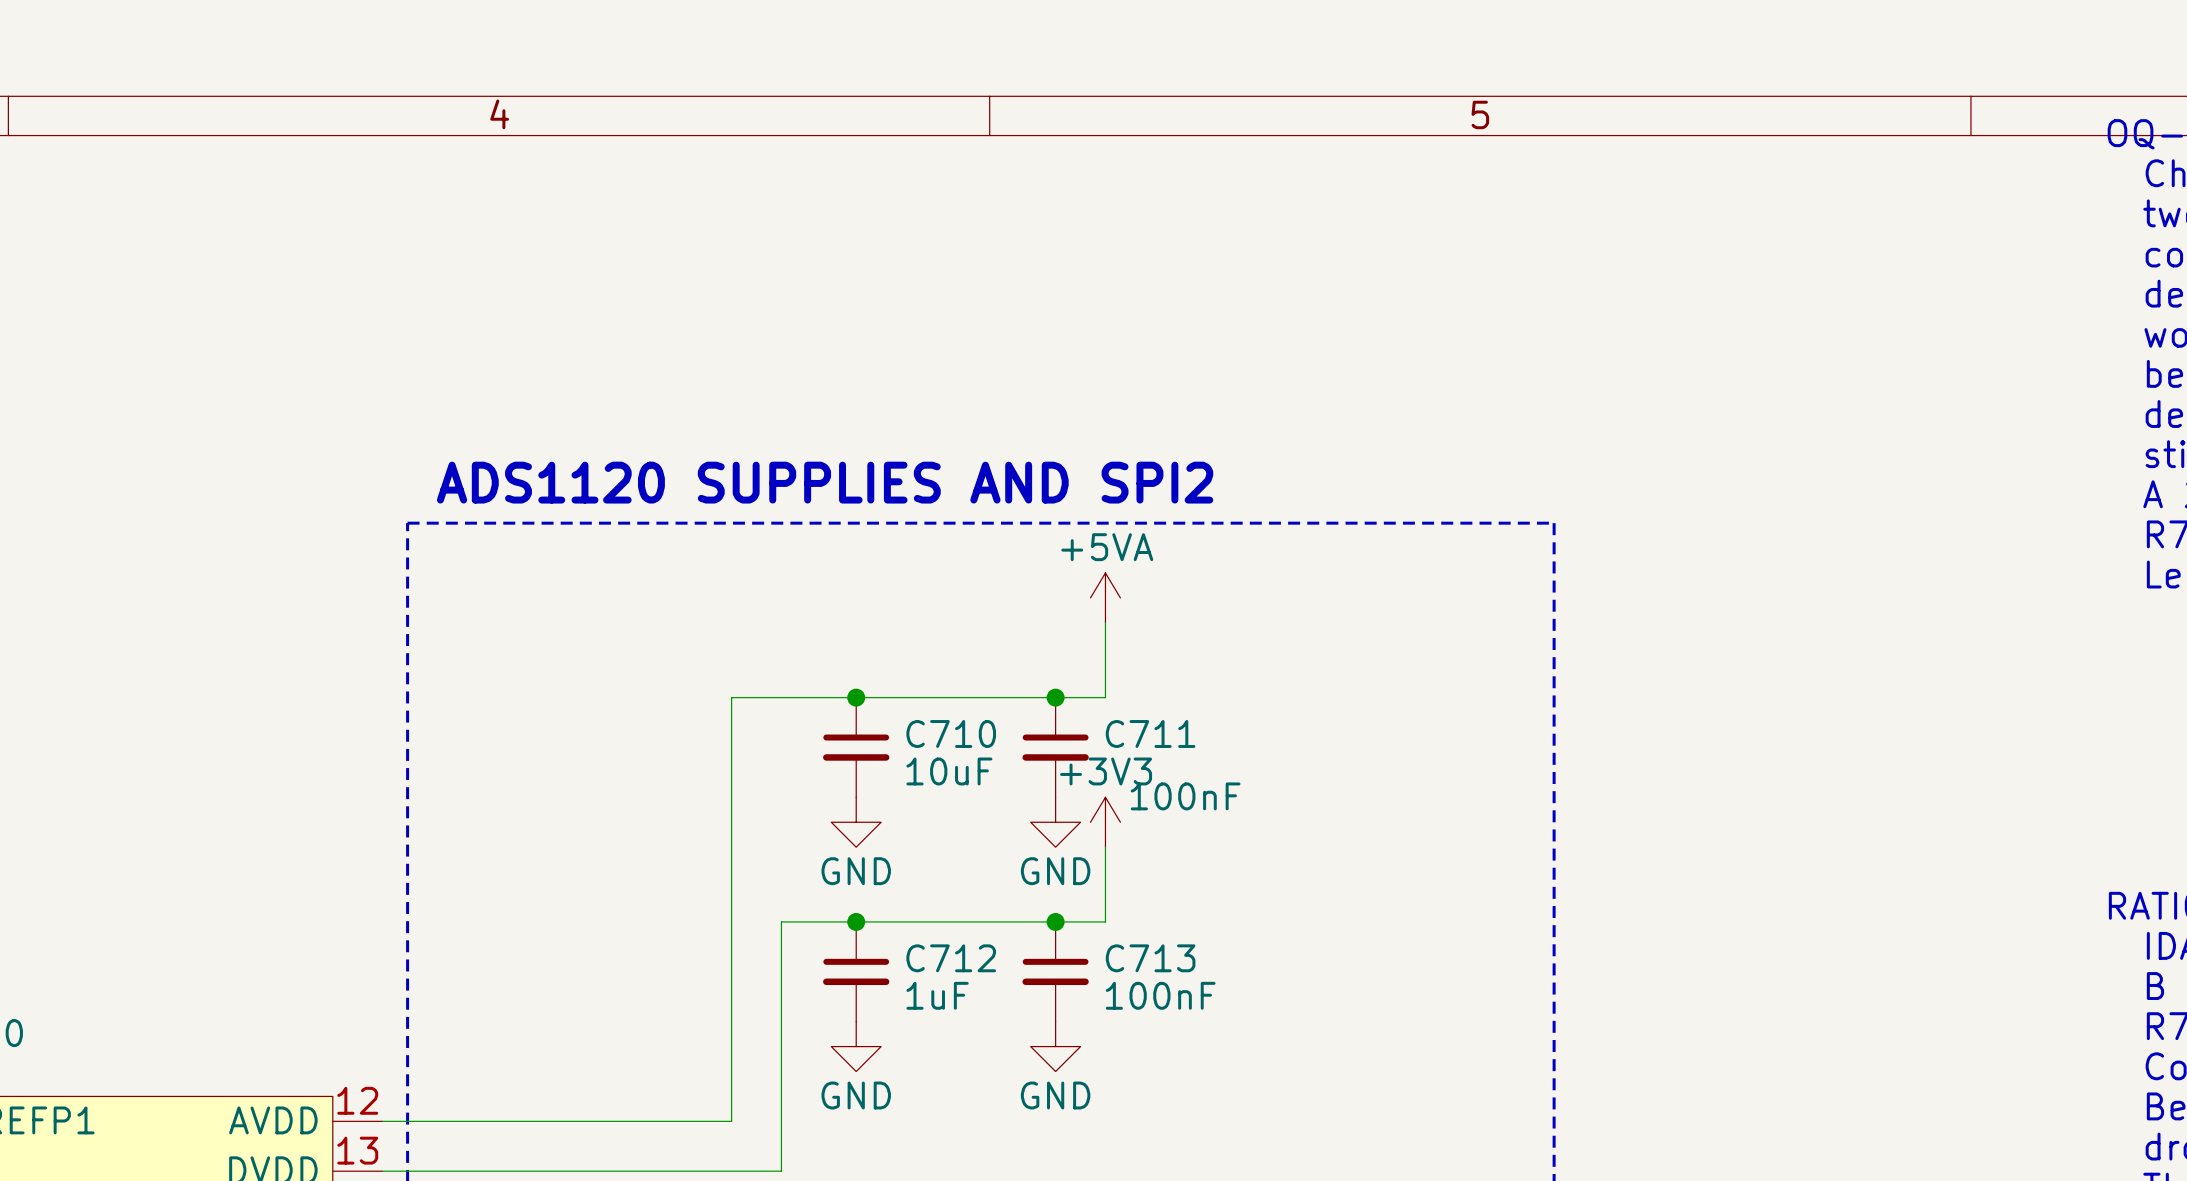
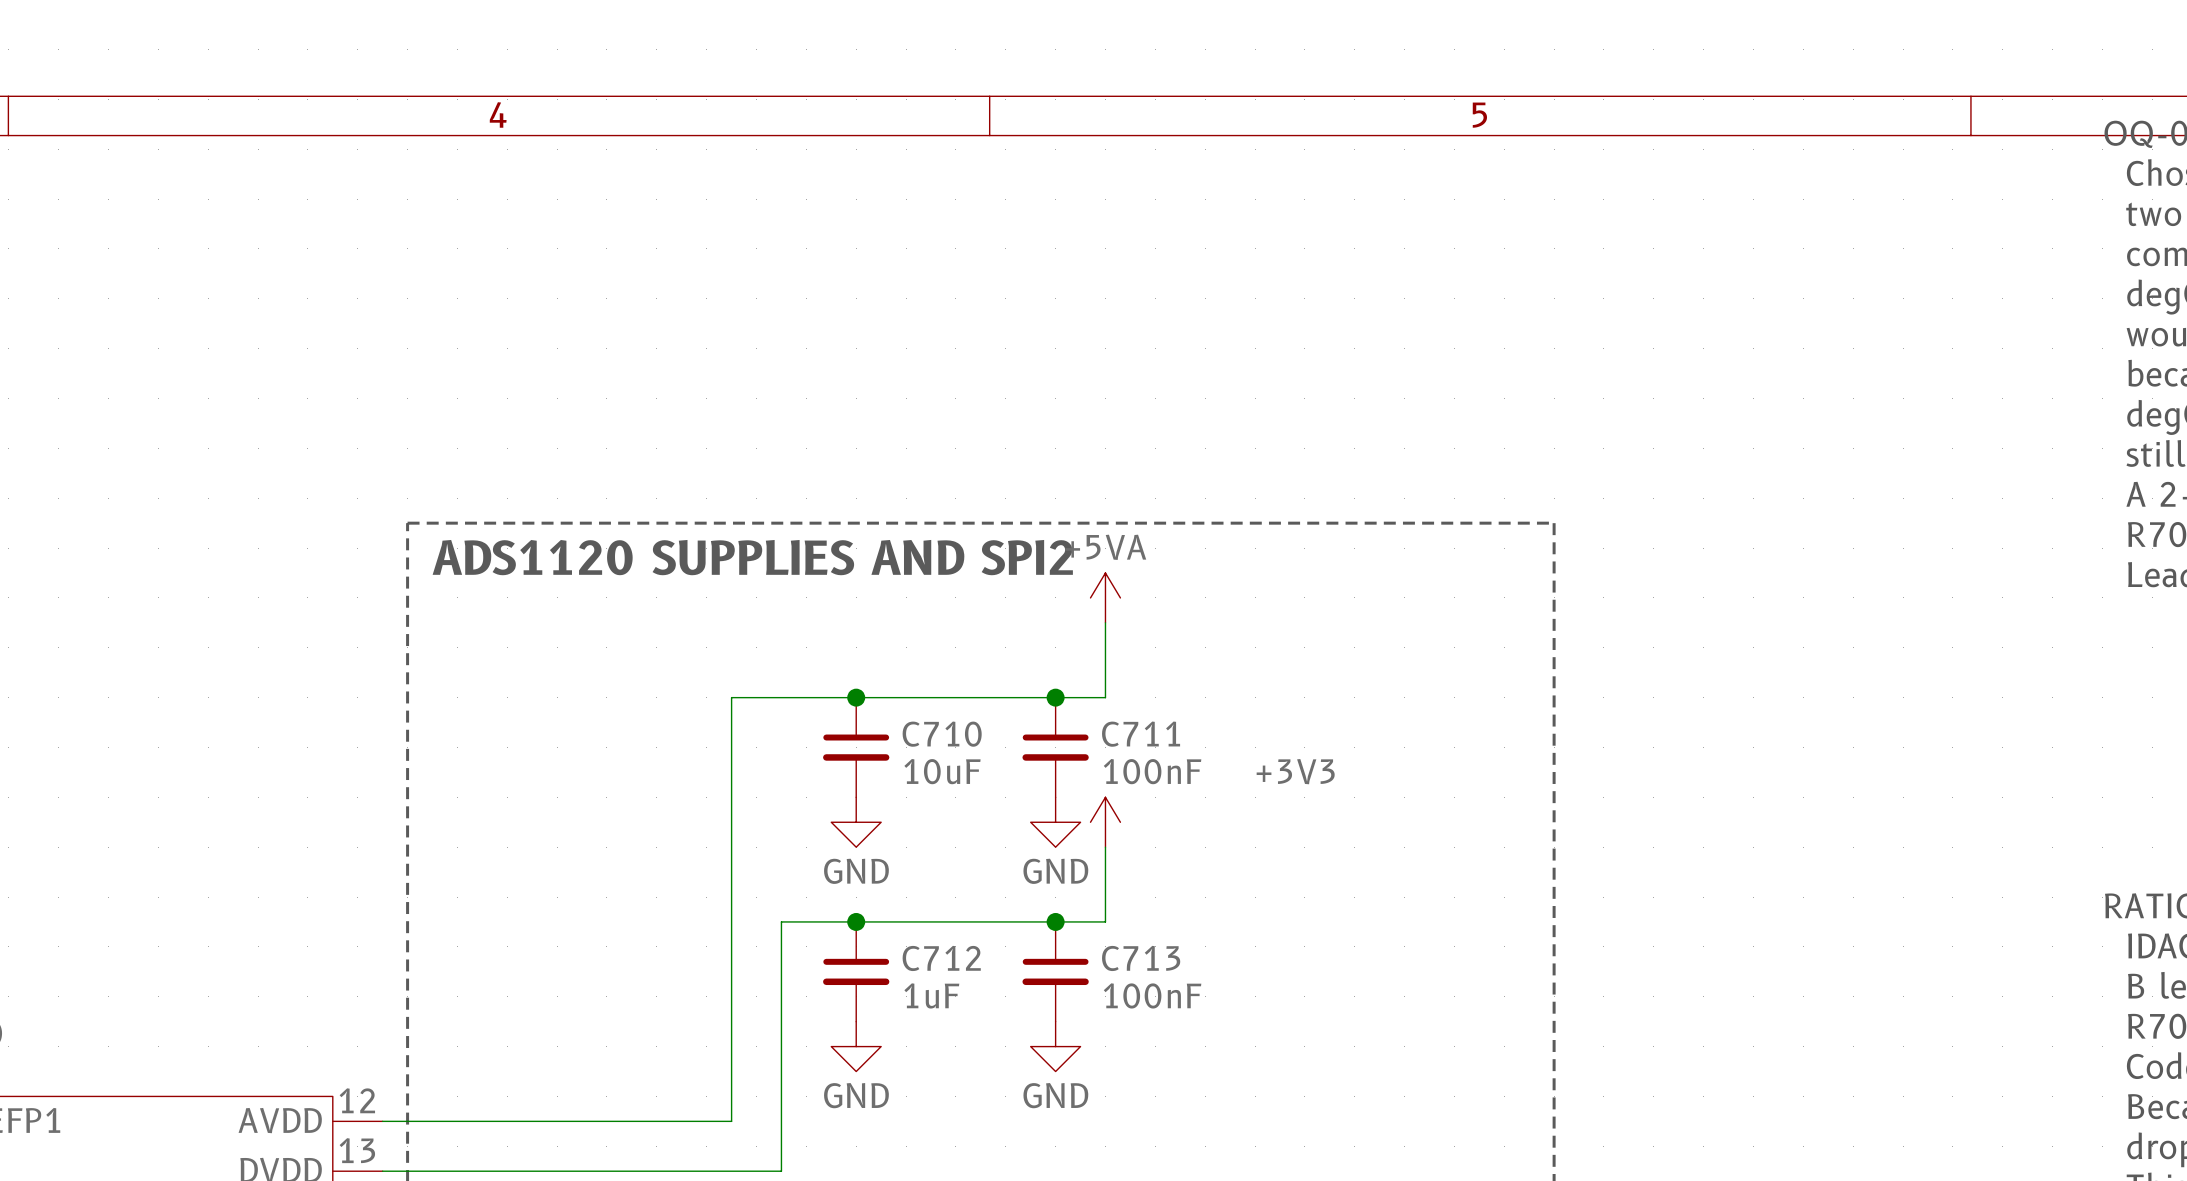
text position: ADS1120 SUPPLIES AND SPI2 (825, 482) -> ADS1120 SUPPLIES AND SPI2 (752, 557)
power symbol text position: +3V3 (1106, 771) -> +3V3 (1295, 771)
C711 value position: 100nF (1185, 796) -> 100nF (1152, 771)

